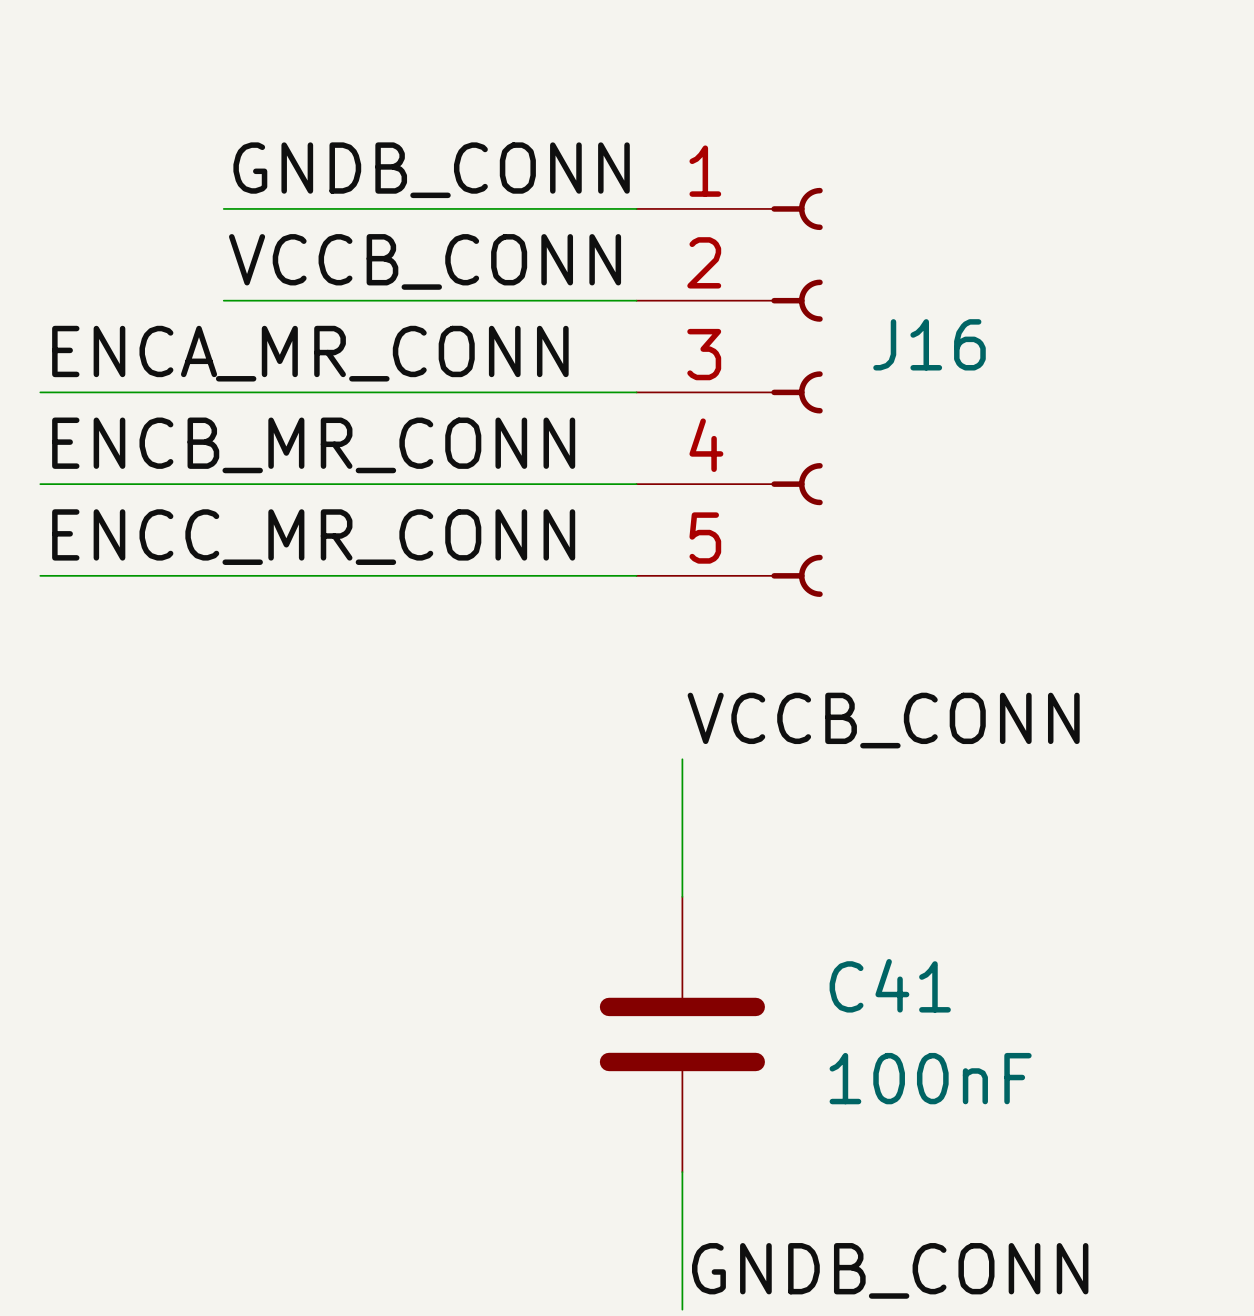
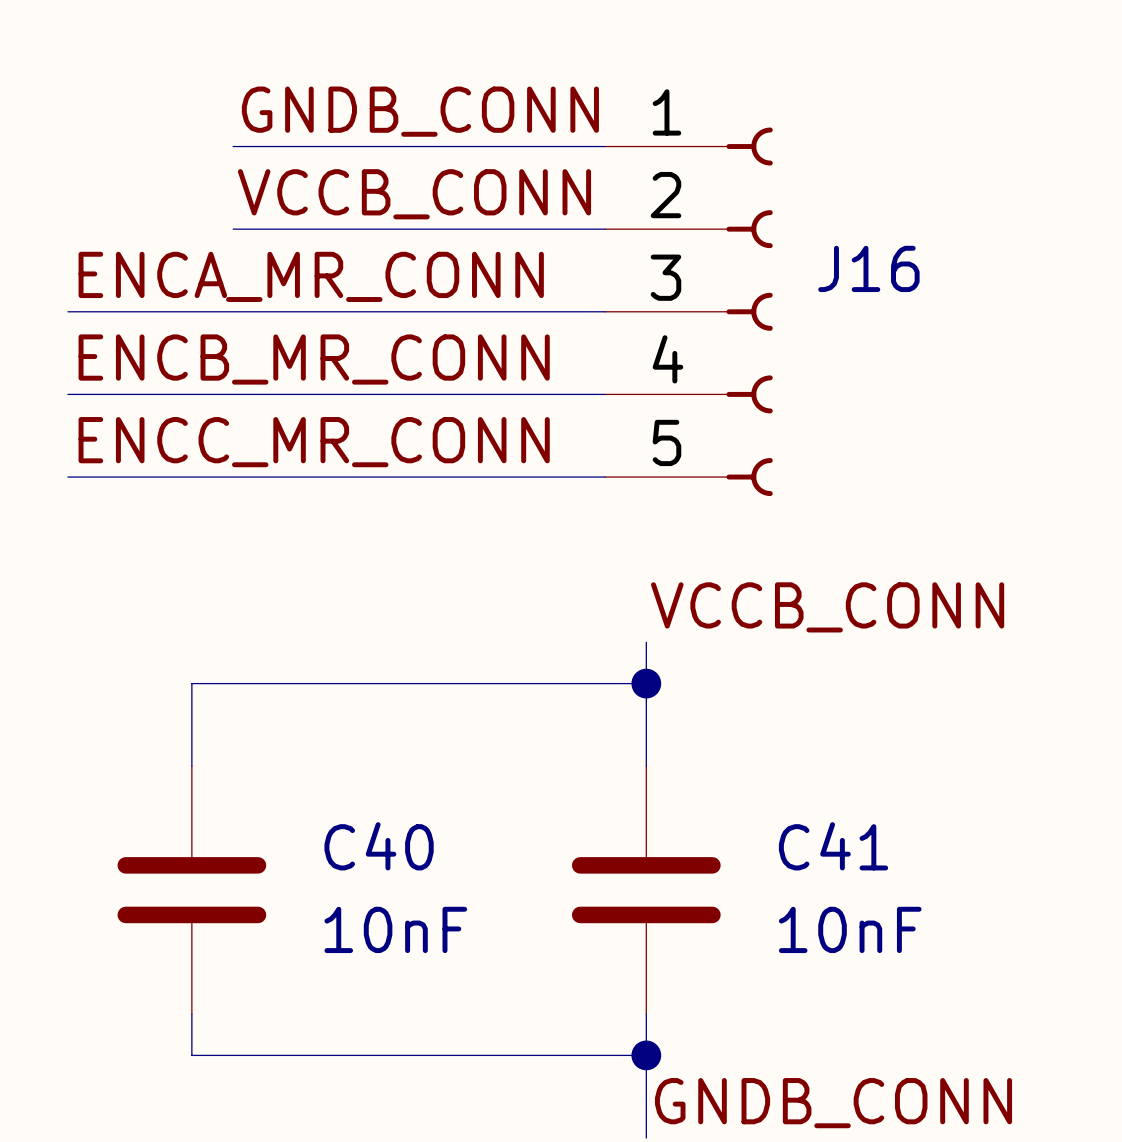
wire: none -> (646, 683) (191, 683) (191, 766)
junction: none -> (646, 683)
C40: none -> 10nF (191, 890)
C41 value: 100nF (930, 1078) -> 10nF (850, 929)
wire: none -> (191, 1014) (191, 1055) (646, 1055)
junction: none -> (646, 1055)

